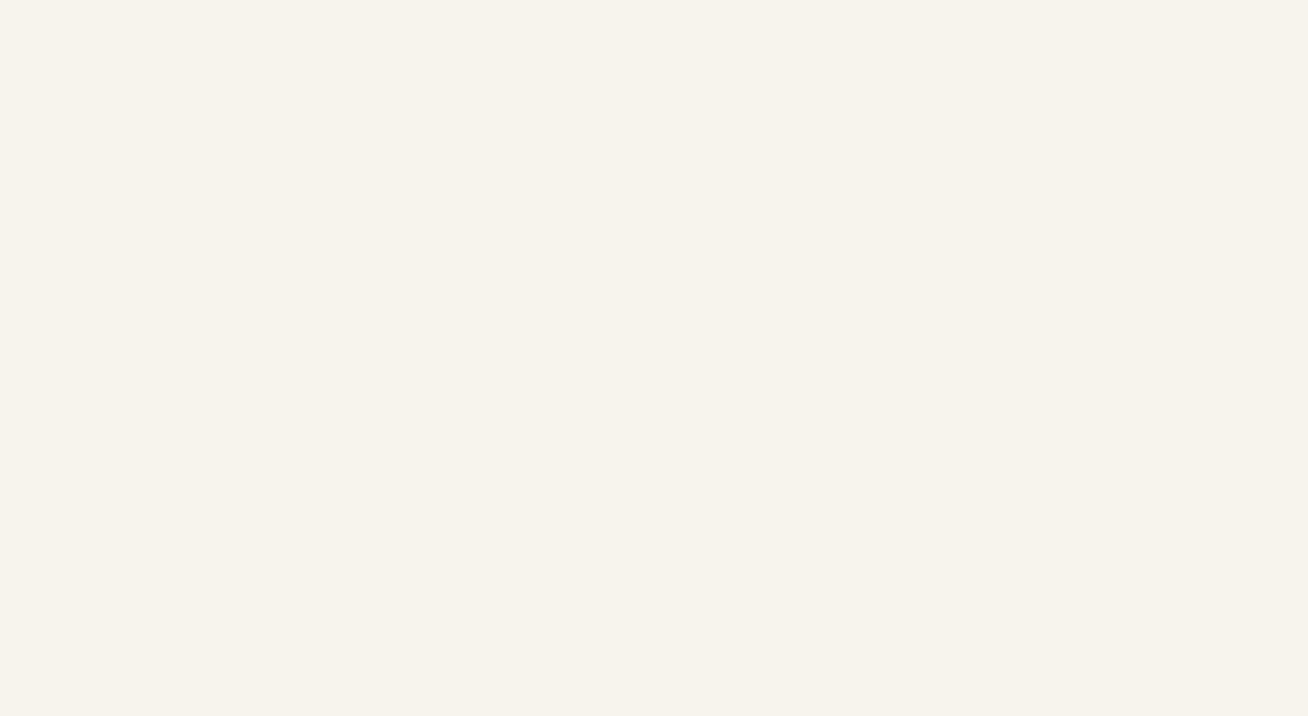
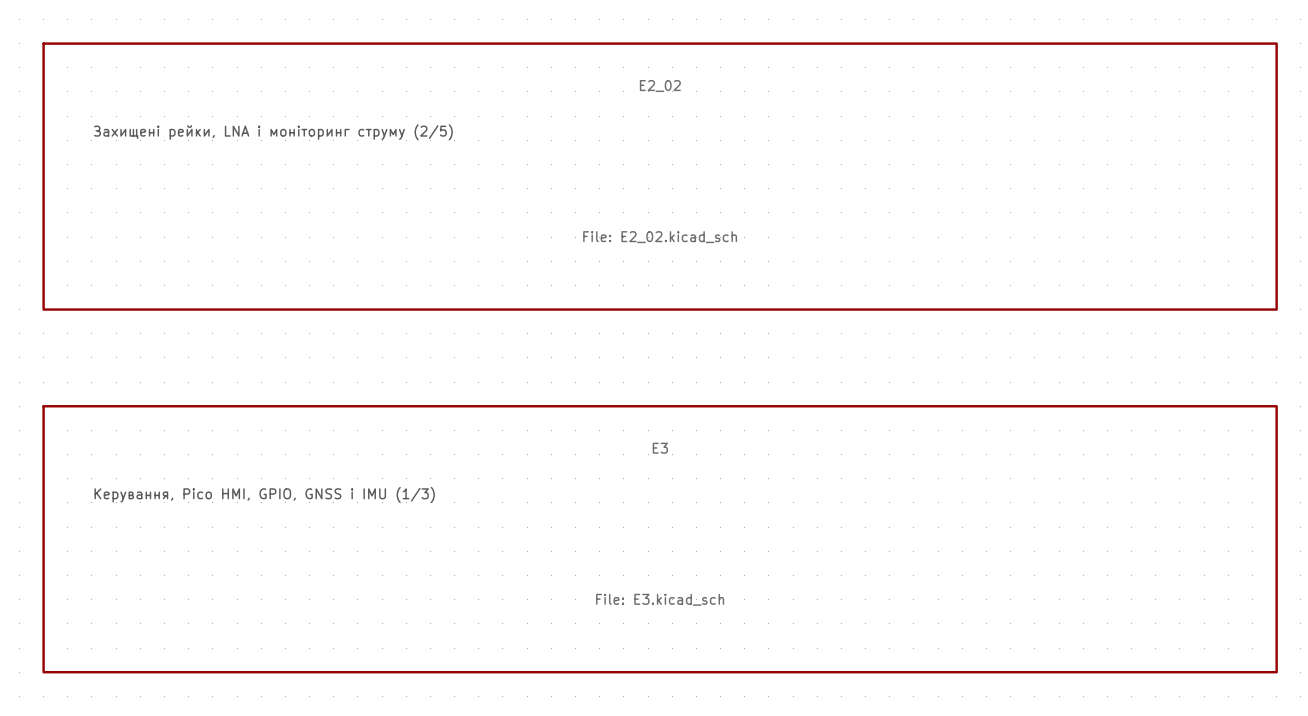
text: none -> Захищені рейки, LNA і моніторинг струму (2/5) (273, 132)
sheet E2_02: none -> File: E2_02.kicad_sch (660, 176)
text: none -> Керування, Pico HMI, GPIO, GNSS і IMU (1/3) (264, 494)
sheet E3: none -> File: E3.kicad_sch (660, 539)

